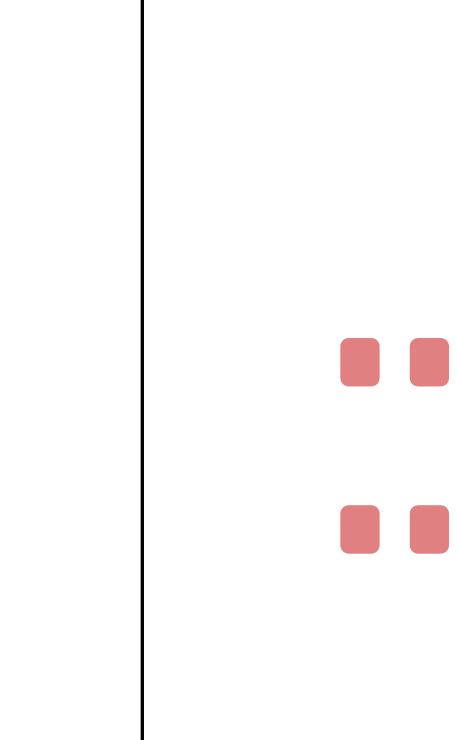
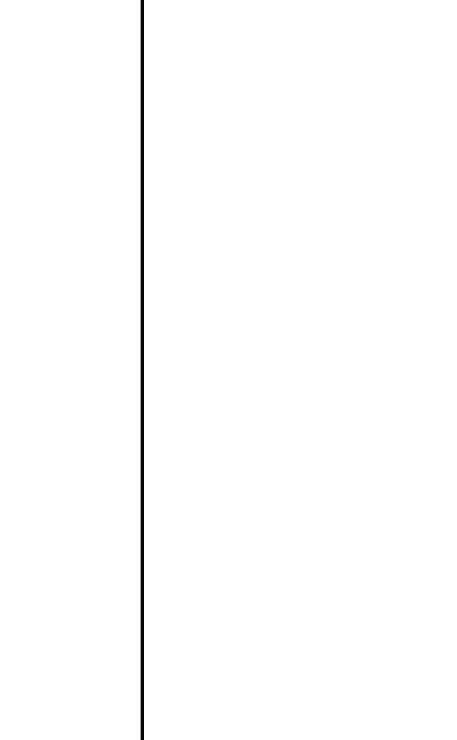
part: (394, 362) -> none
part: (394, 529) -> none

